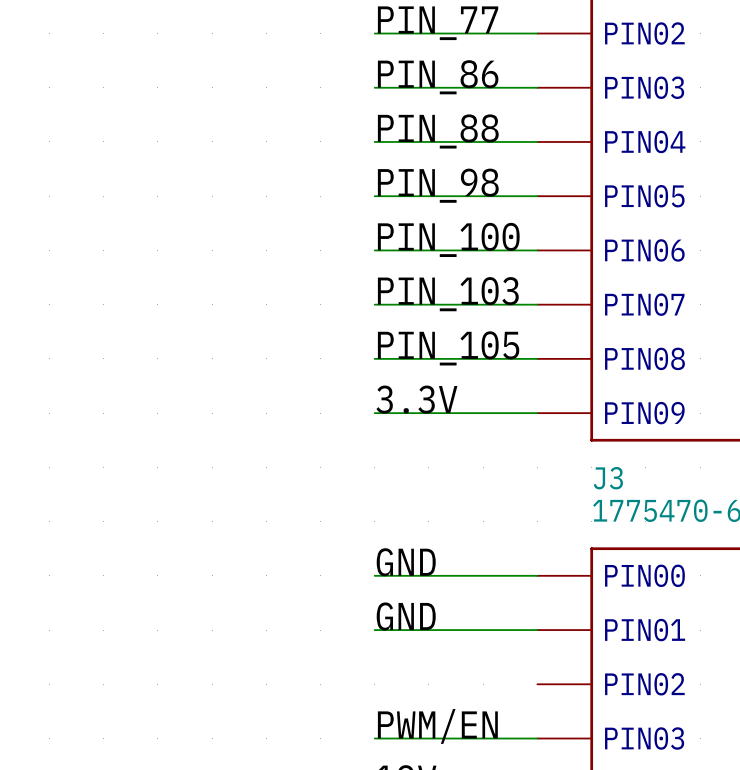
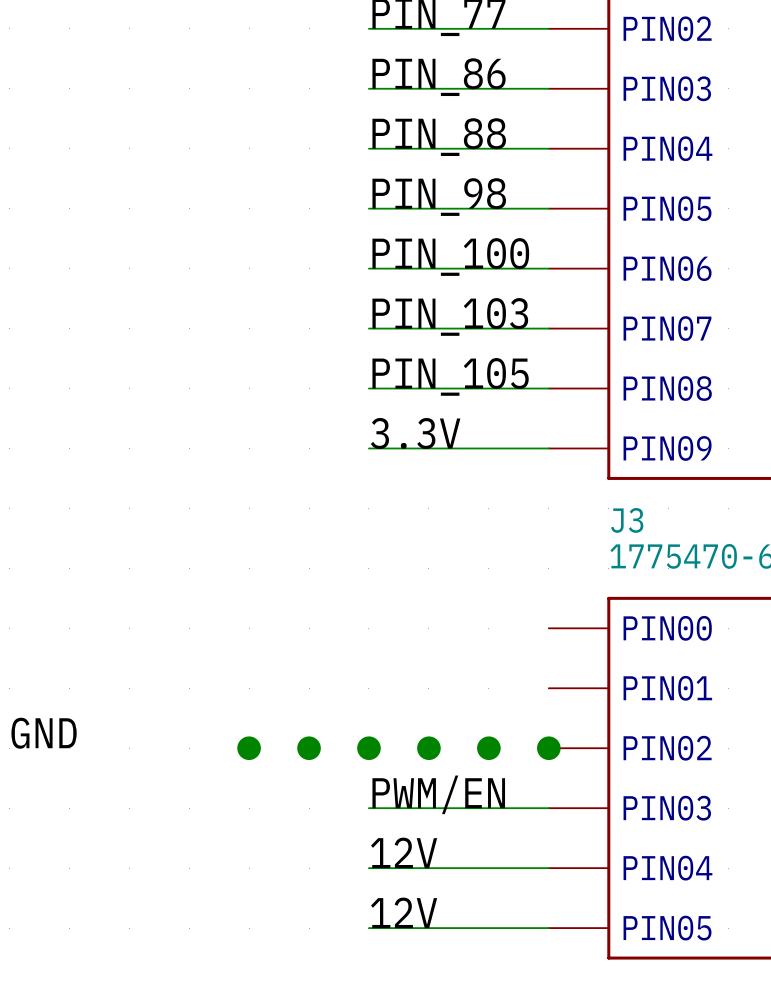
label: GND (406, 562) -> none
wire: (374, 575) (537, 575) -> none
label: GND (406, 616) -> none
wire: (374, 630) (537, 630) -> none
label: none -> GND (44, 733)
junction: none -> (249, 748)
junction: none -> (309, 748)
junction: none -> (368, 748)
junction: none -> (428, 748)
junction: none -> (488, 748)
junction: none -> (548, 748)

